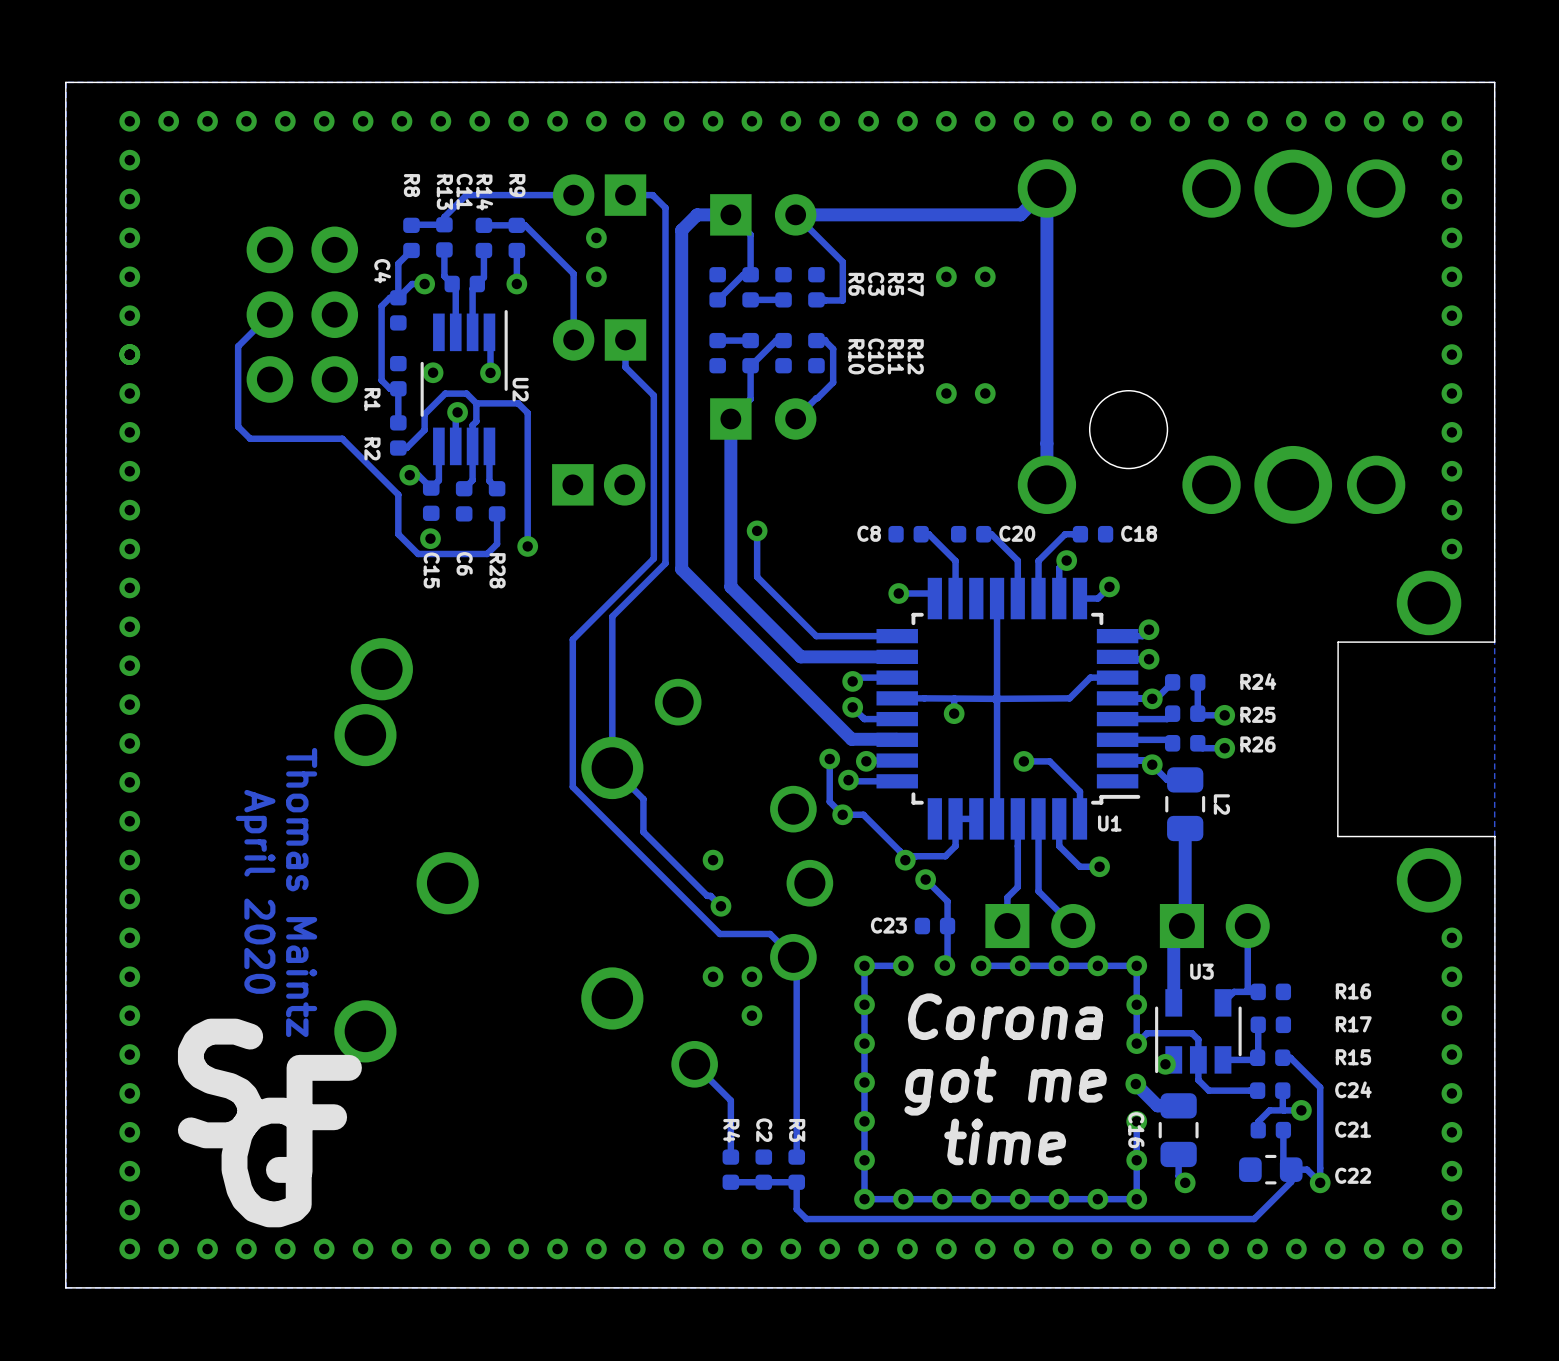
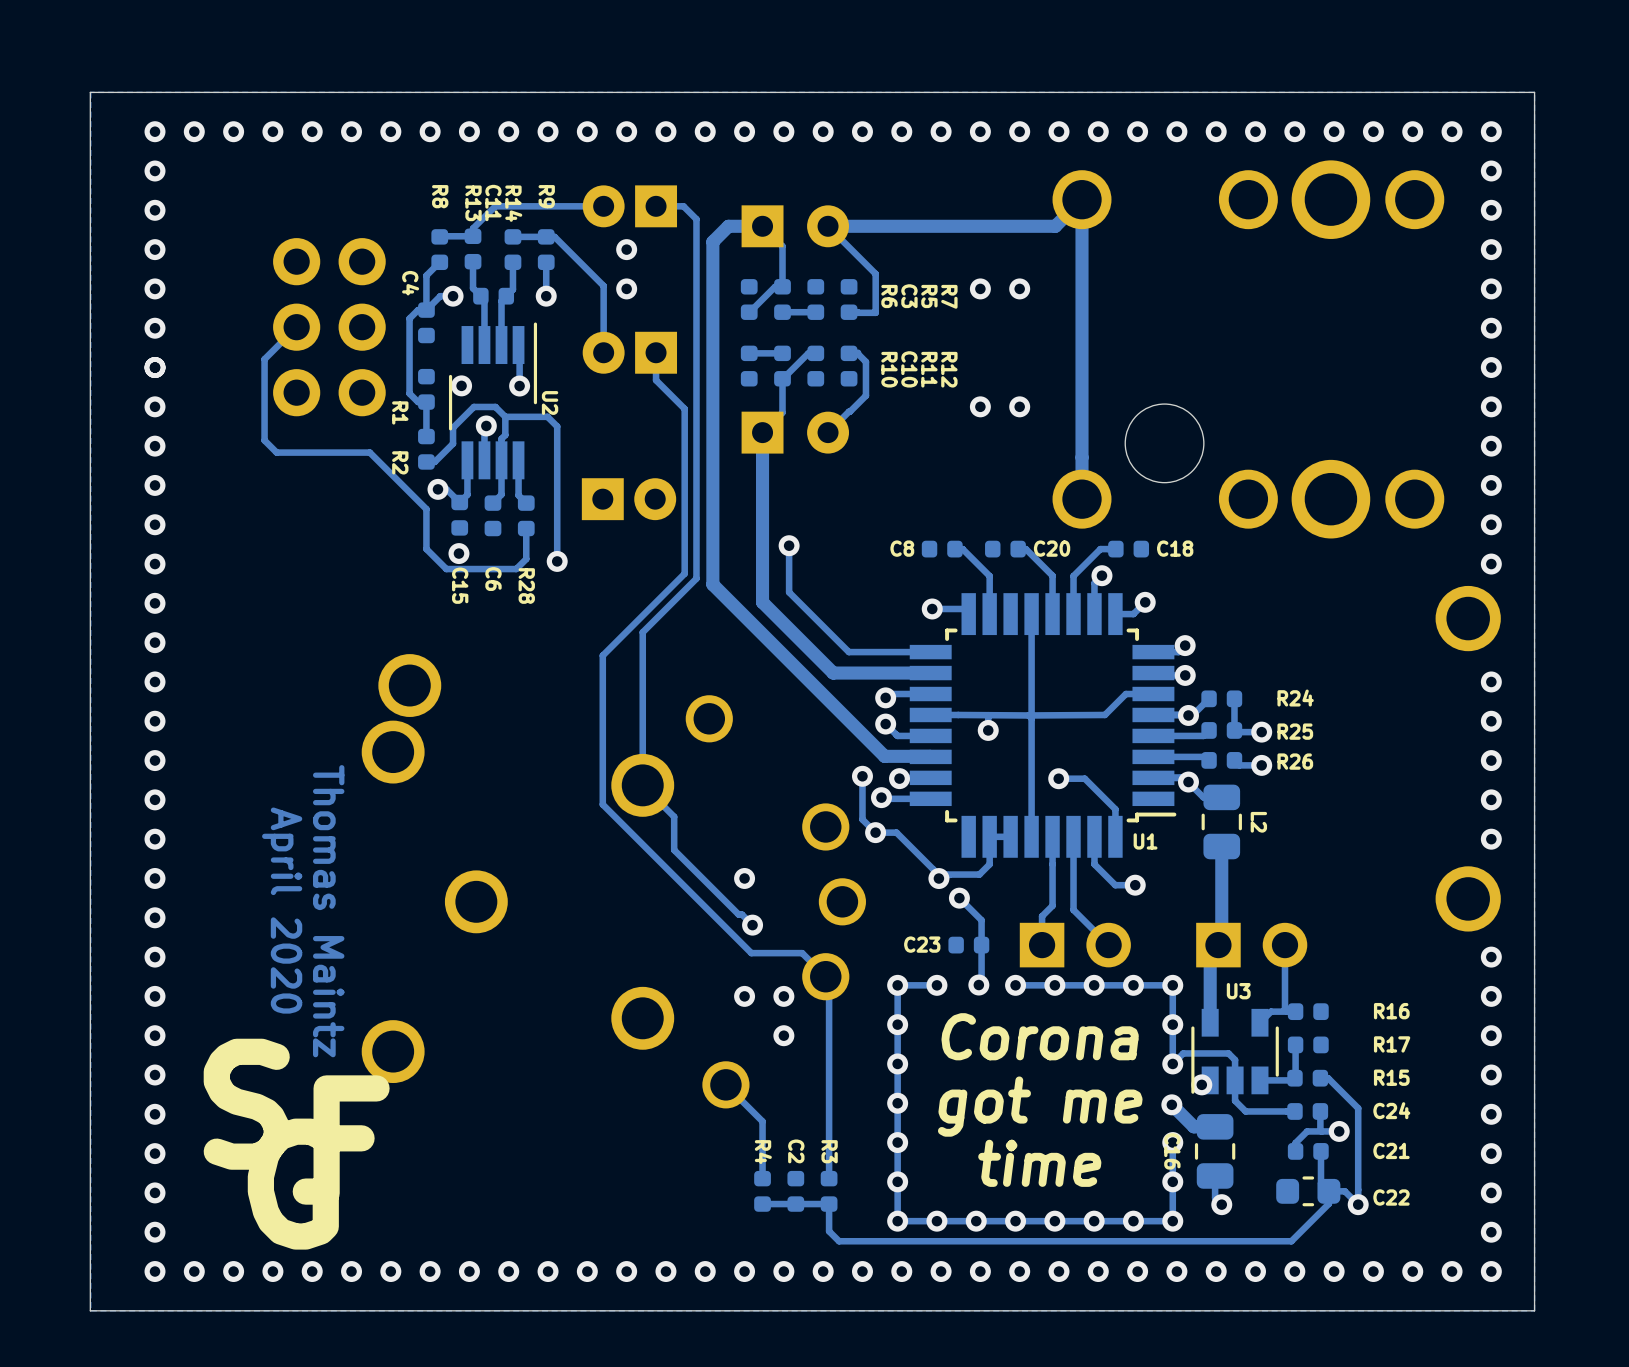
board edge: (1494, 642) (1338, 642) (1337, 836) (1494, 836) (1494, 1287) -> (1534, 658) (1534, 1310)
via: none -> (1491, 681)
via: none -> (1491, 721)
via: none -> (1491, 760)
via: none -> (1491, 799)
via: none -> (1491, 839)

